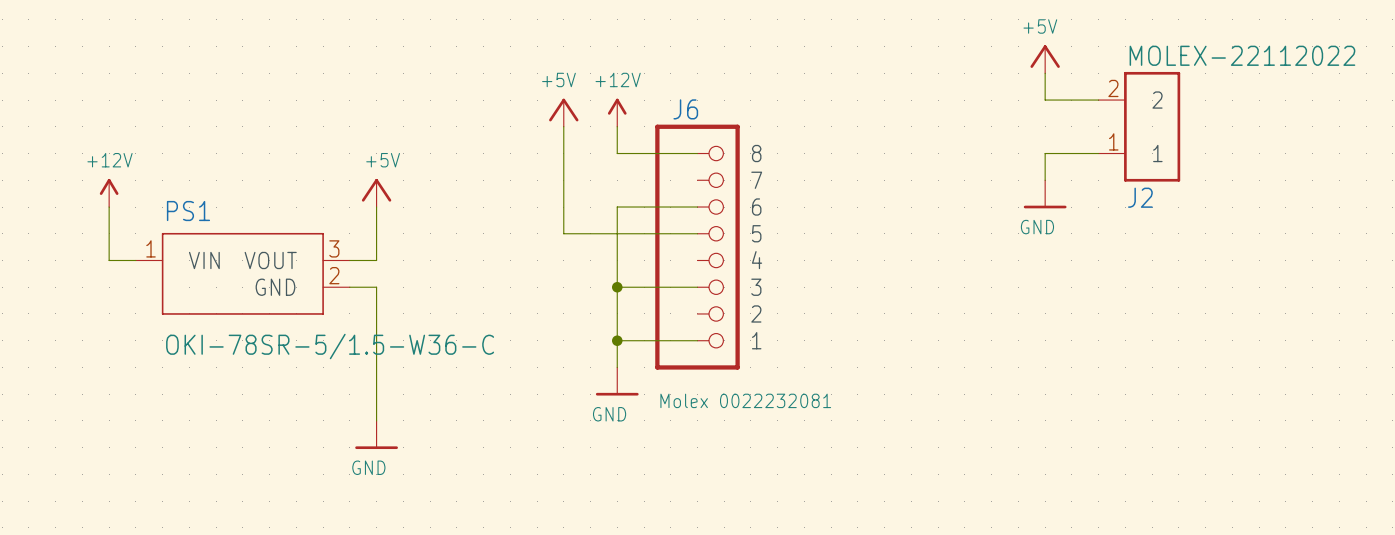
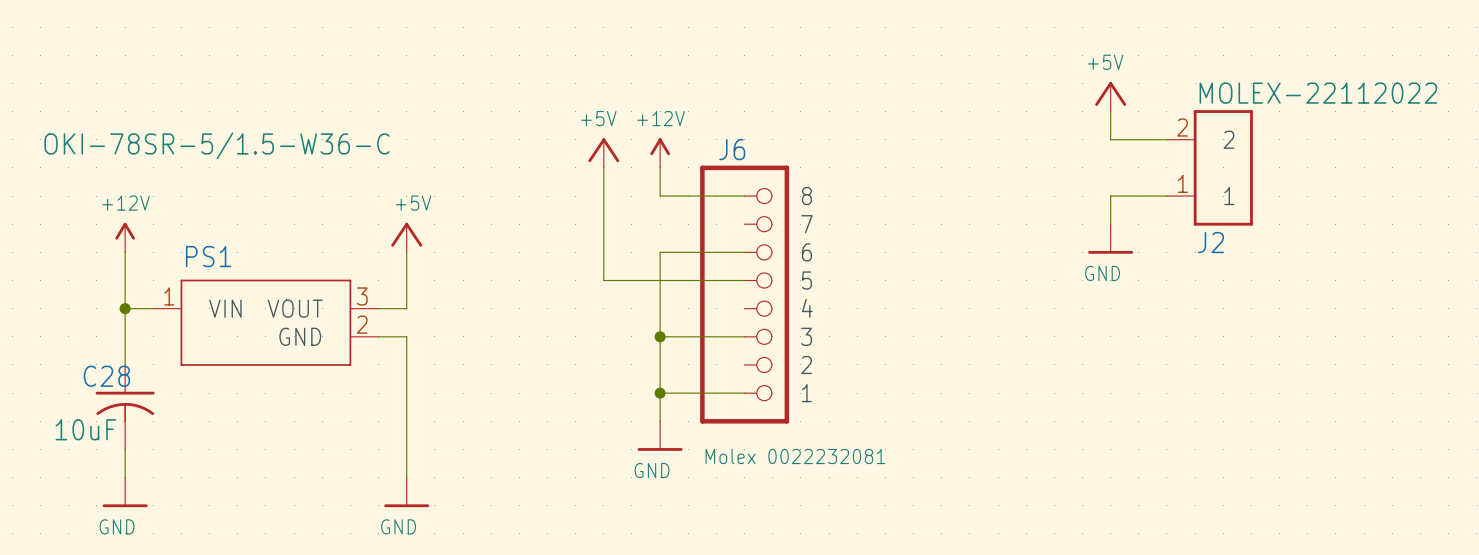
wire: none -> (125, 308) (125, 364)
junction: none -> (125, 308)
PS1 value position: OKI-78SR-5/1.5-W36-C (330, 346) -> OKI-78SR-5/1.5-W36-C (216, 145)
C28: none -> 10uF (125, 407)
wire: none -> (125, 449) (125, 477)
power symbol: none -> GND (125, 492)

